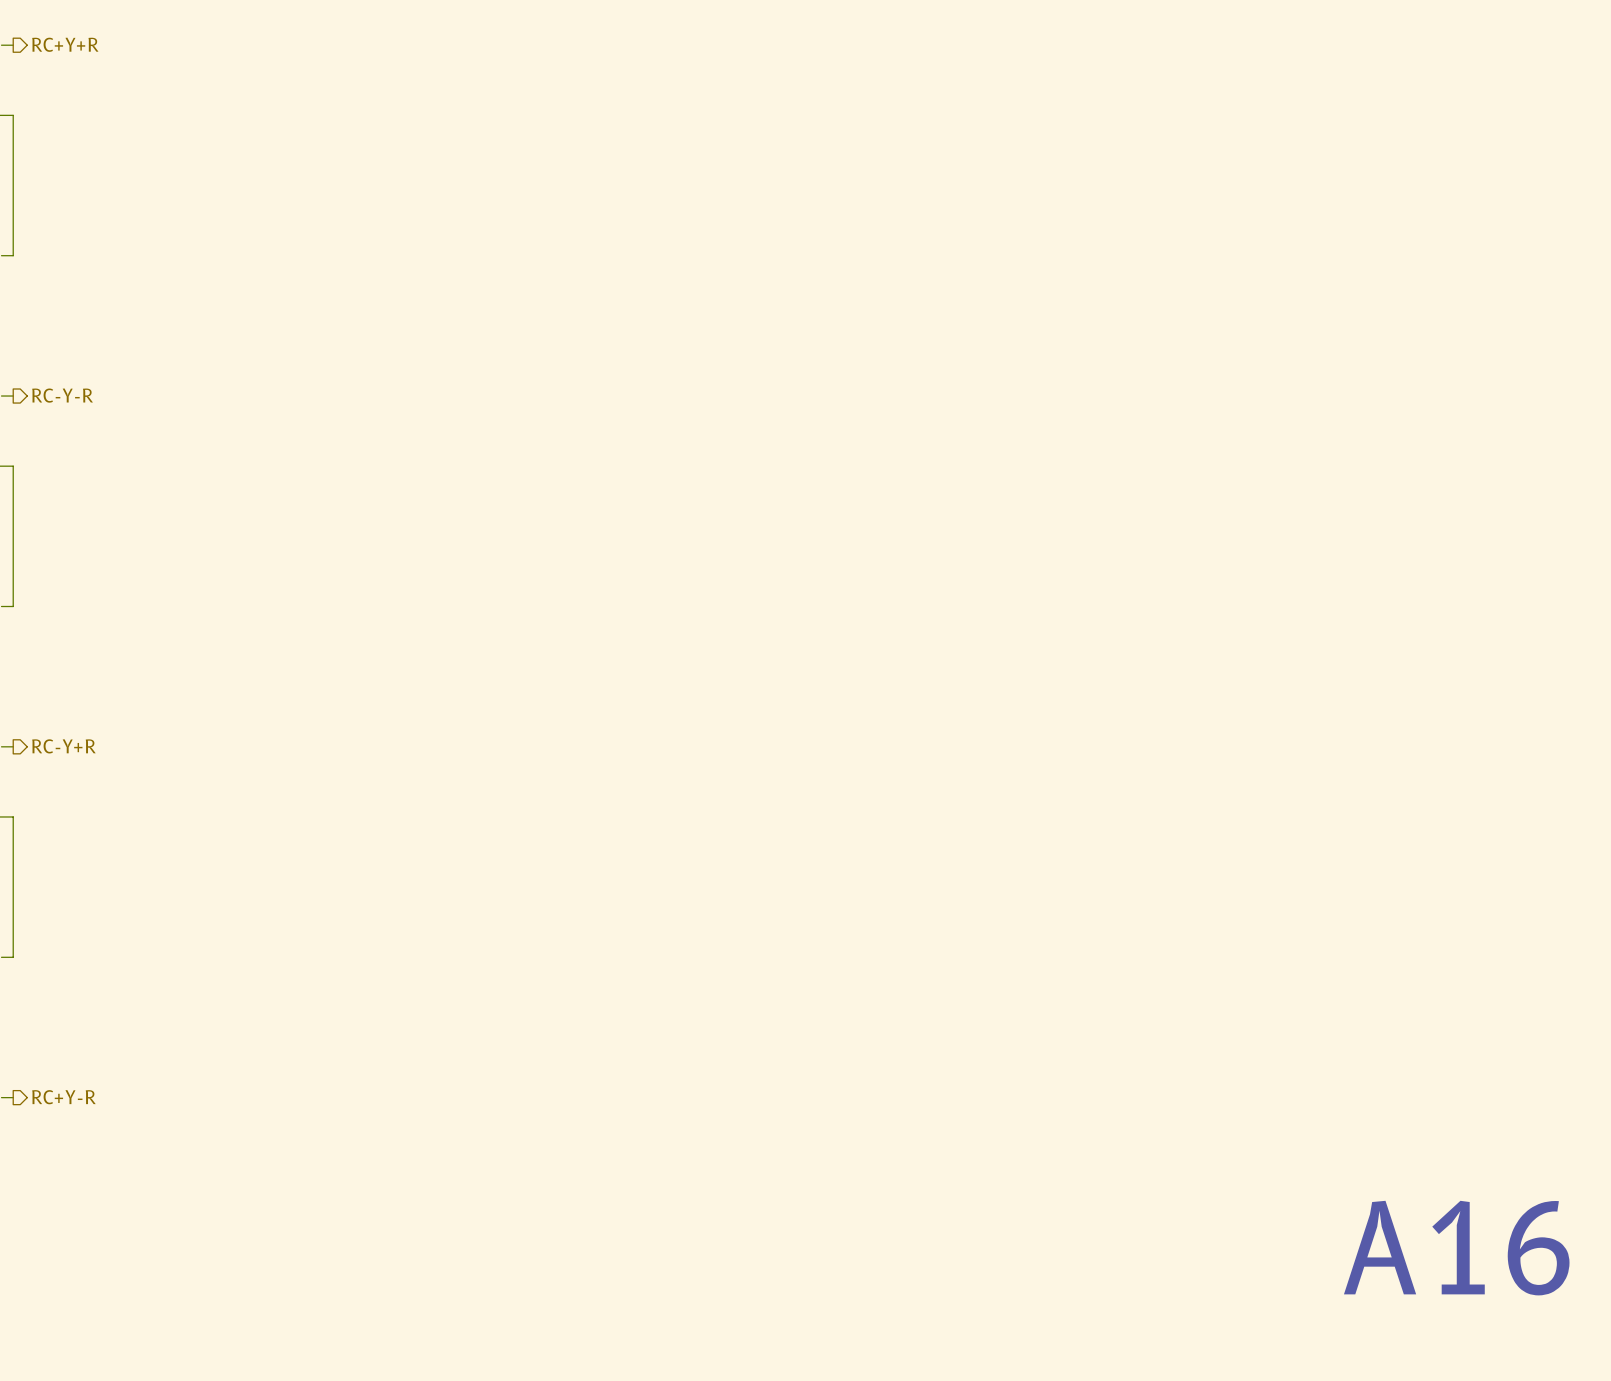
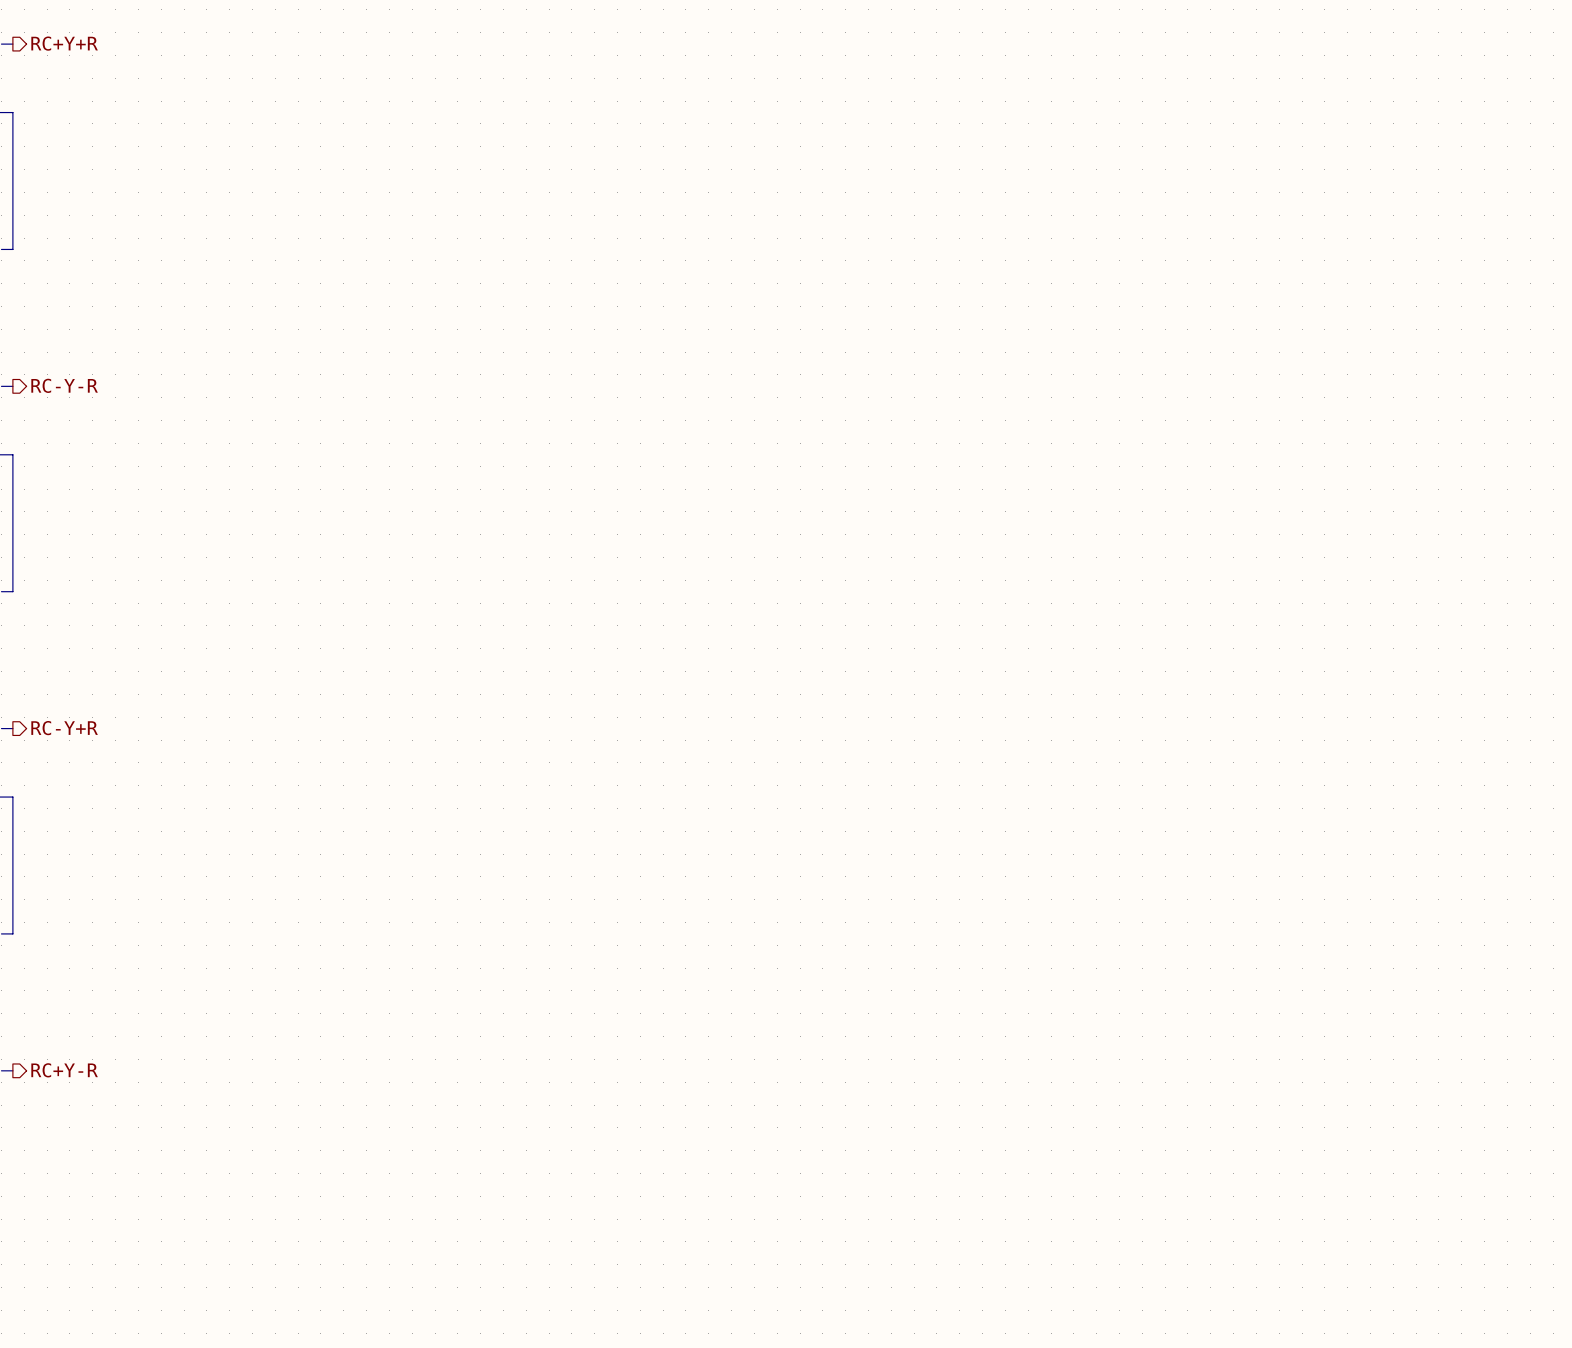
text: A16 (1456, 1248) -> none

